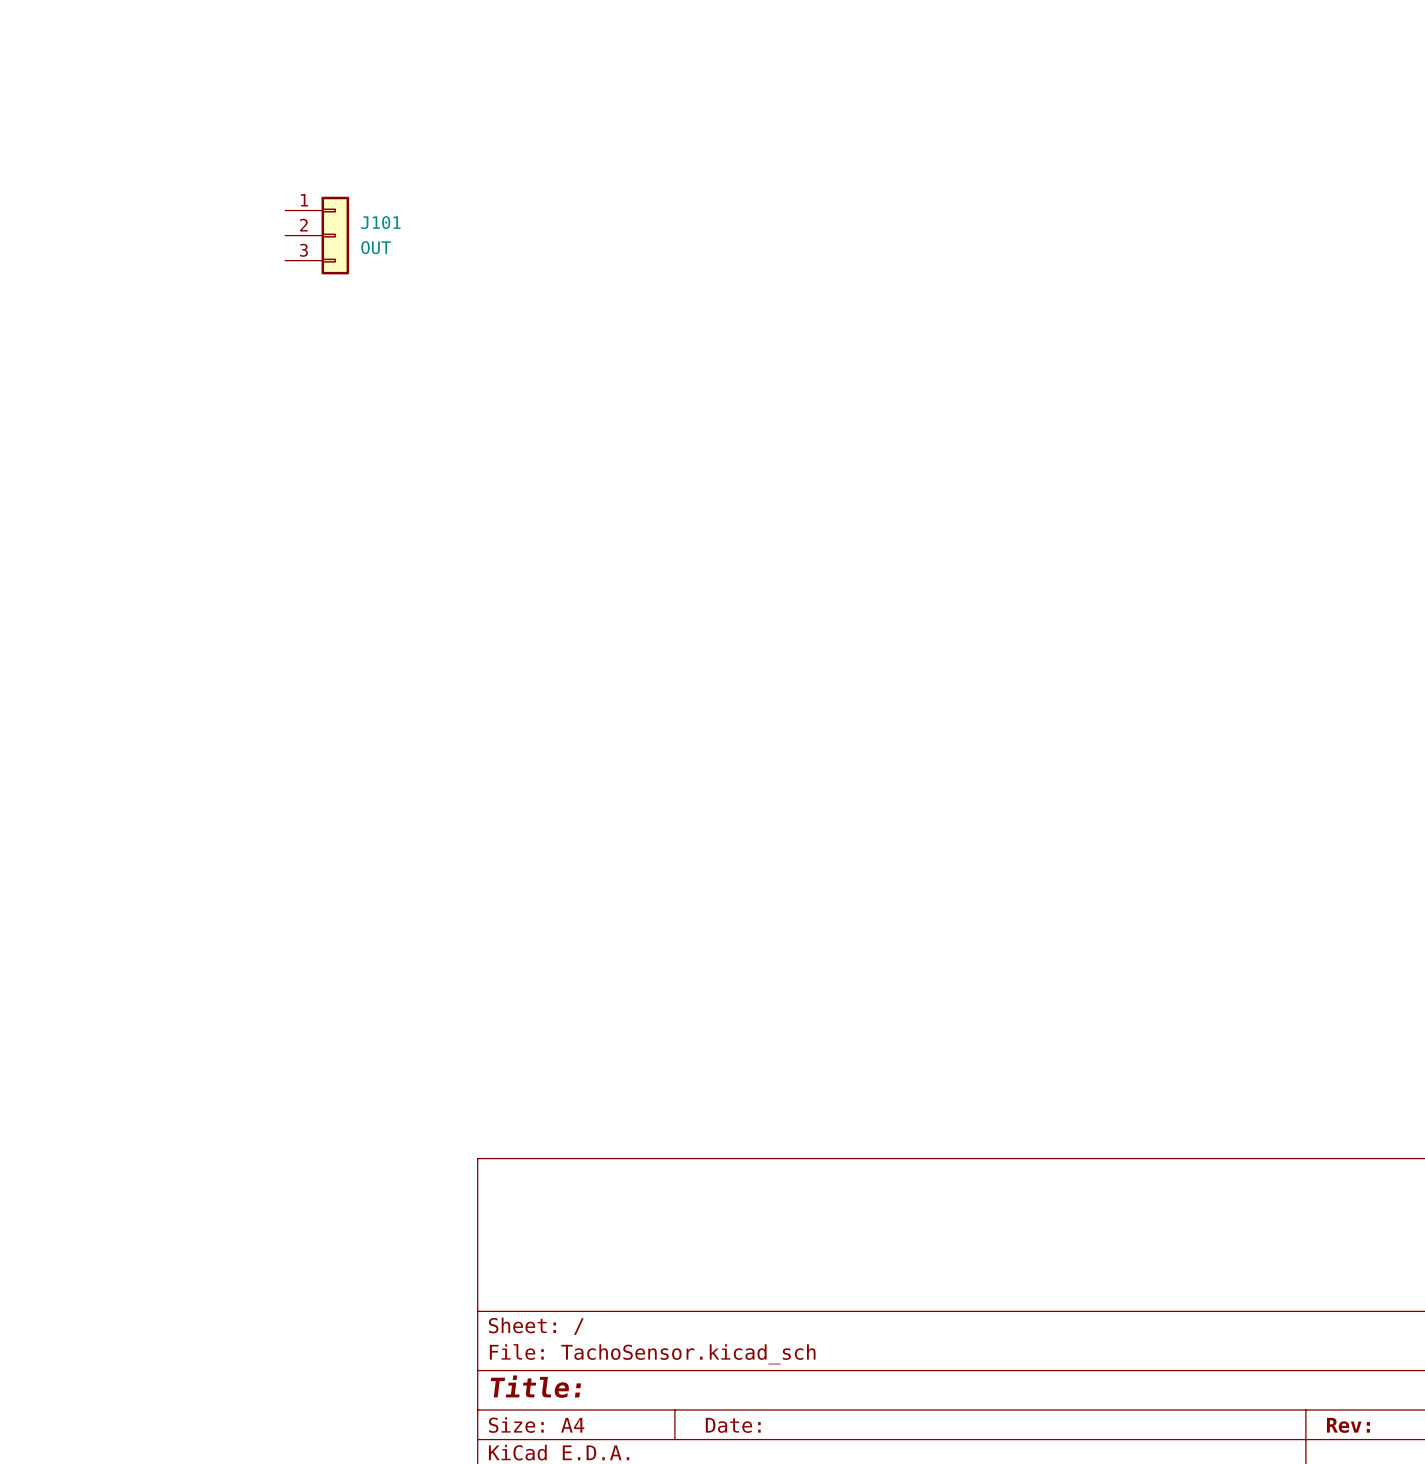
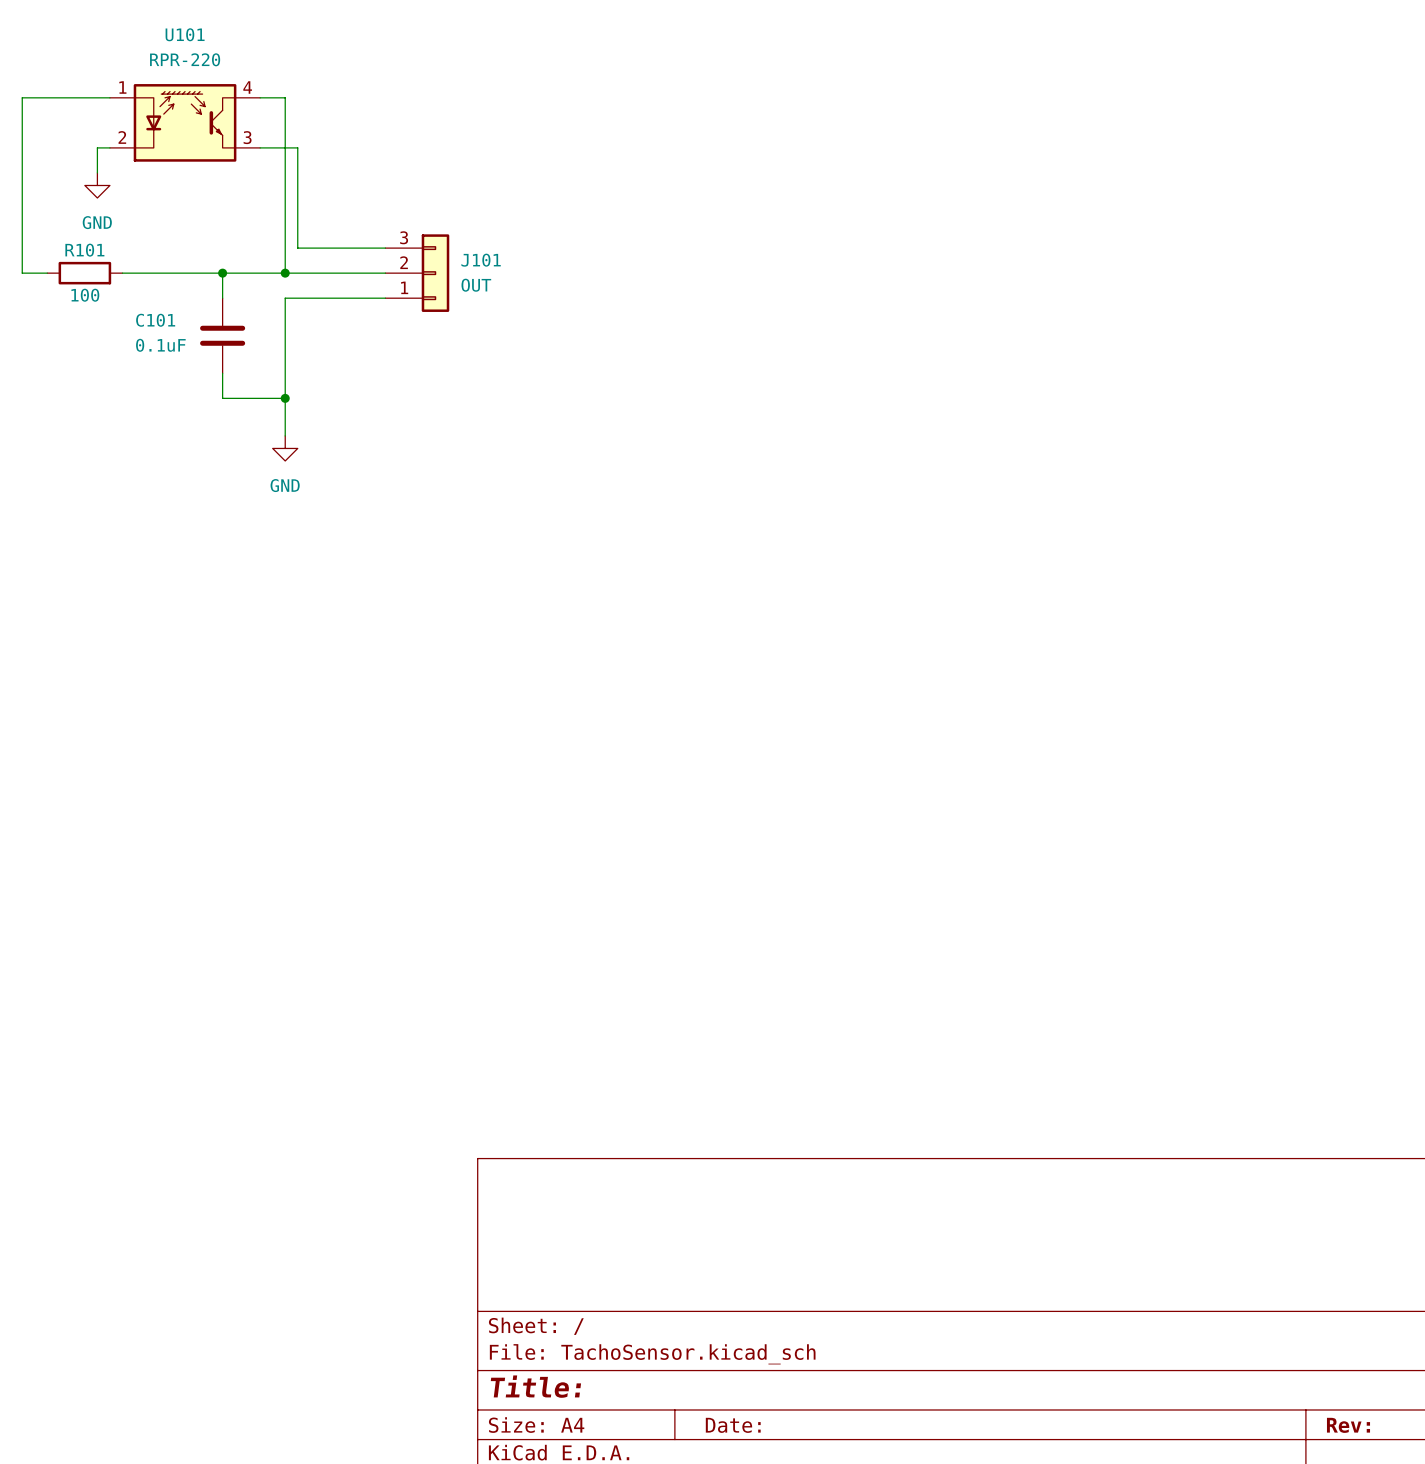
wire: none -> (109, 97) (22, 97) (22, 273) (47, 273)
wire: none -> (260, 97) (285, 97) (285, 273)
U101: none -> RPR-220 (185, 122)
wire: none -> (109, 147) (97, 147) (97, 172)
wire: none -> (260, 147) (297, 147) (297, 248) (385, 248)
power symbol: none -> GND (97, 185)
J101 position: (317, 235) -> (417, 273)
J101 flip: as is (335, 235) -> up-down (435, 273)
R101: none -> 100 (84, 273)
wire: none -> (122, 273) (385, 273)
wire: none -> (222, 273) (222, 298)
junction: none -> (222, 273)
junction: none -> (285, 273)
wire: none -> (385, 298) (285, 298) (285, 435)
C101: none -> 0.1uF (222, 335)
wire: none -> (222, 373) (222, 398) (285, 398)
junction: none -> (285, 398)
power symbol: none -> GND (285, 448)

